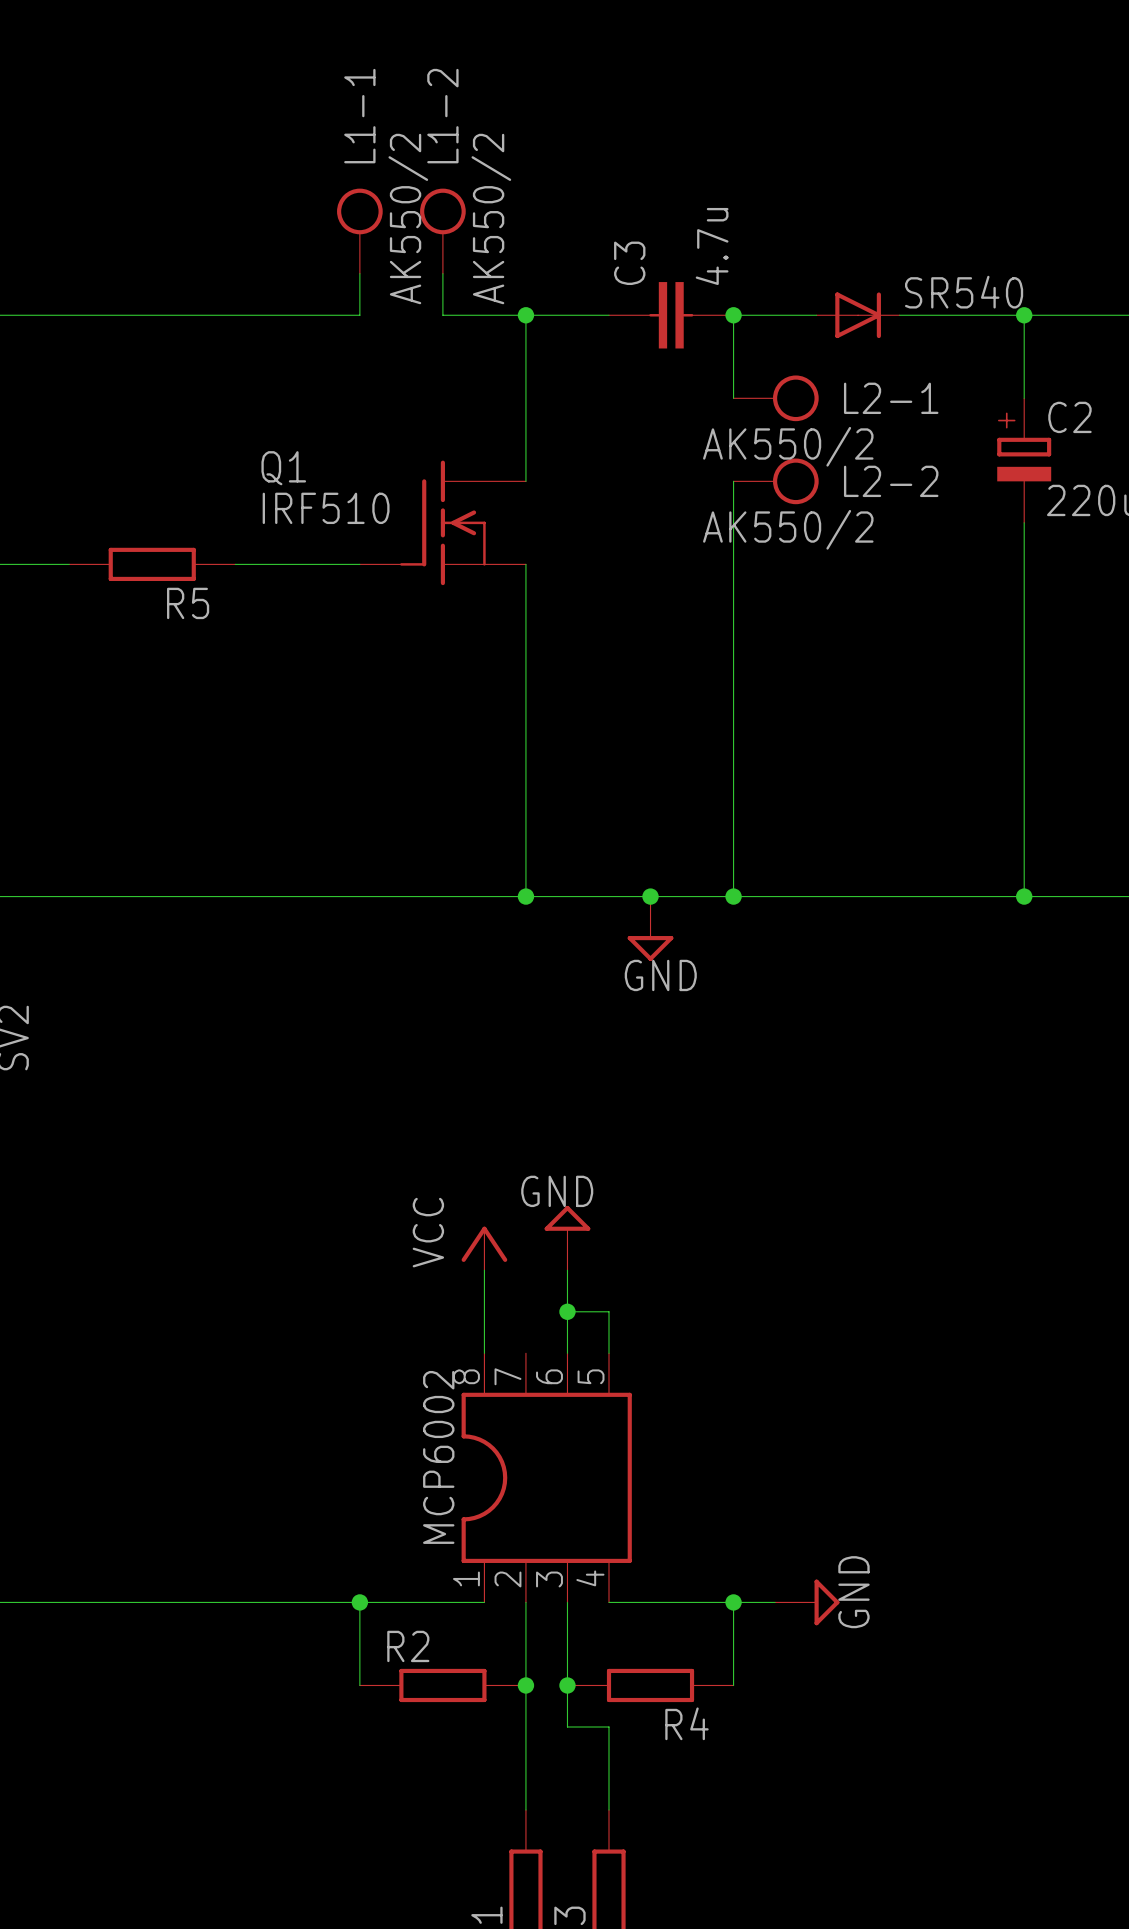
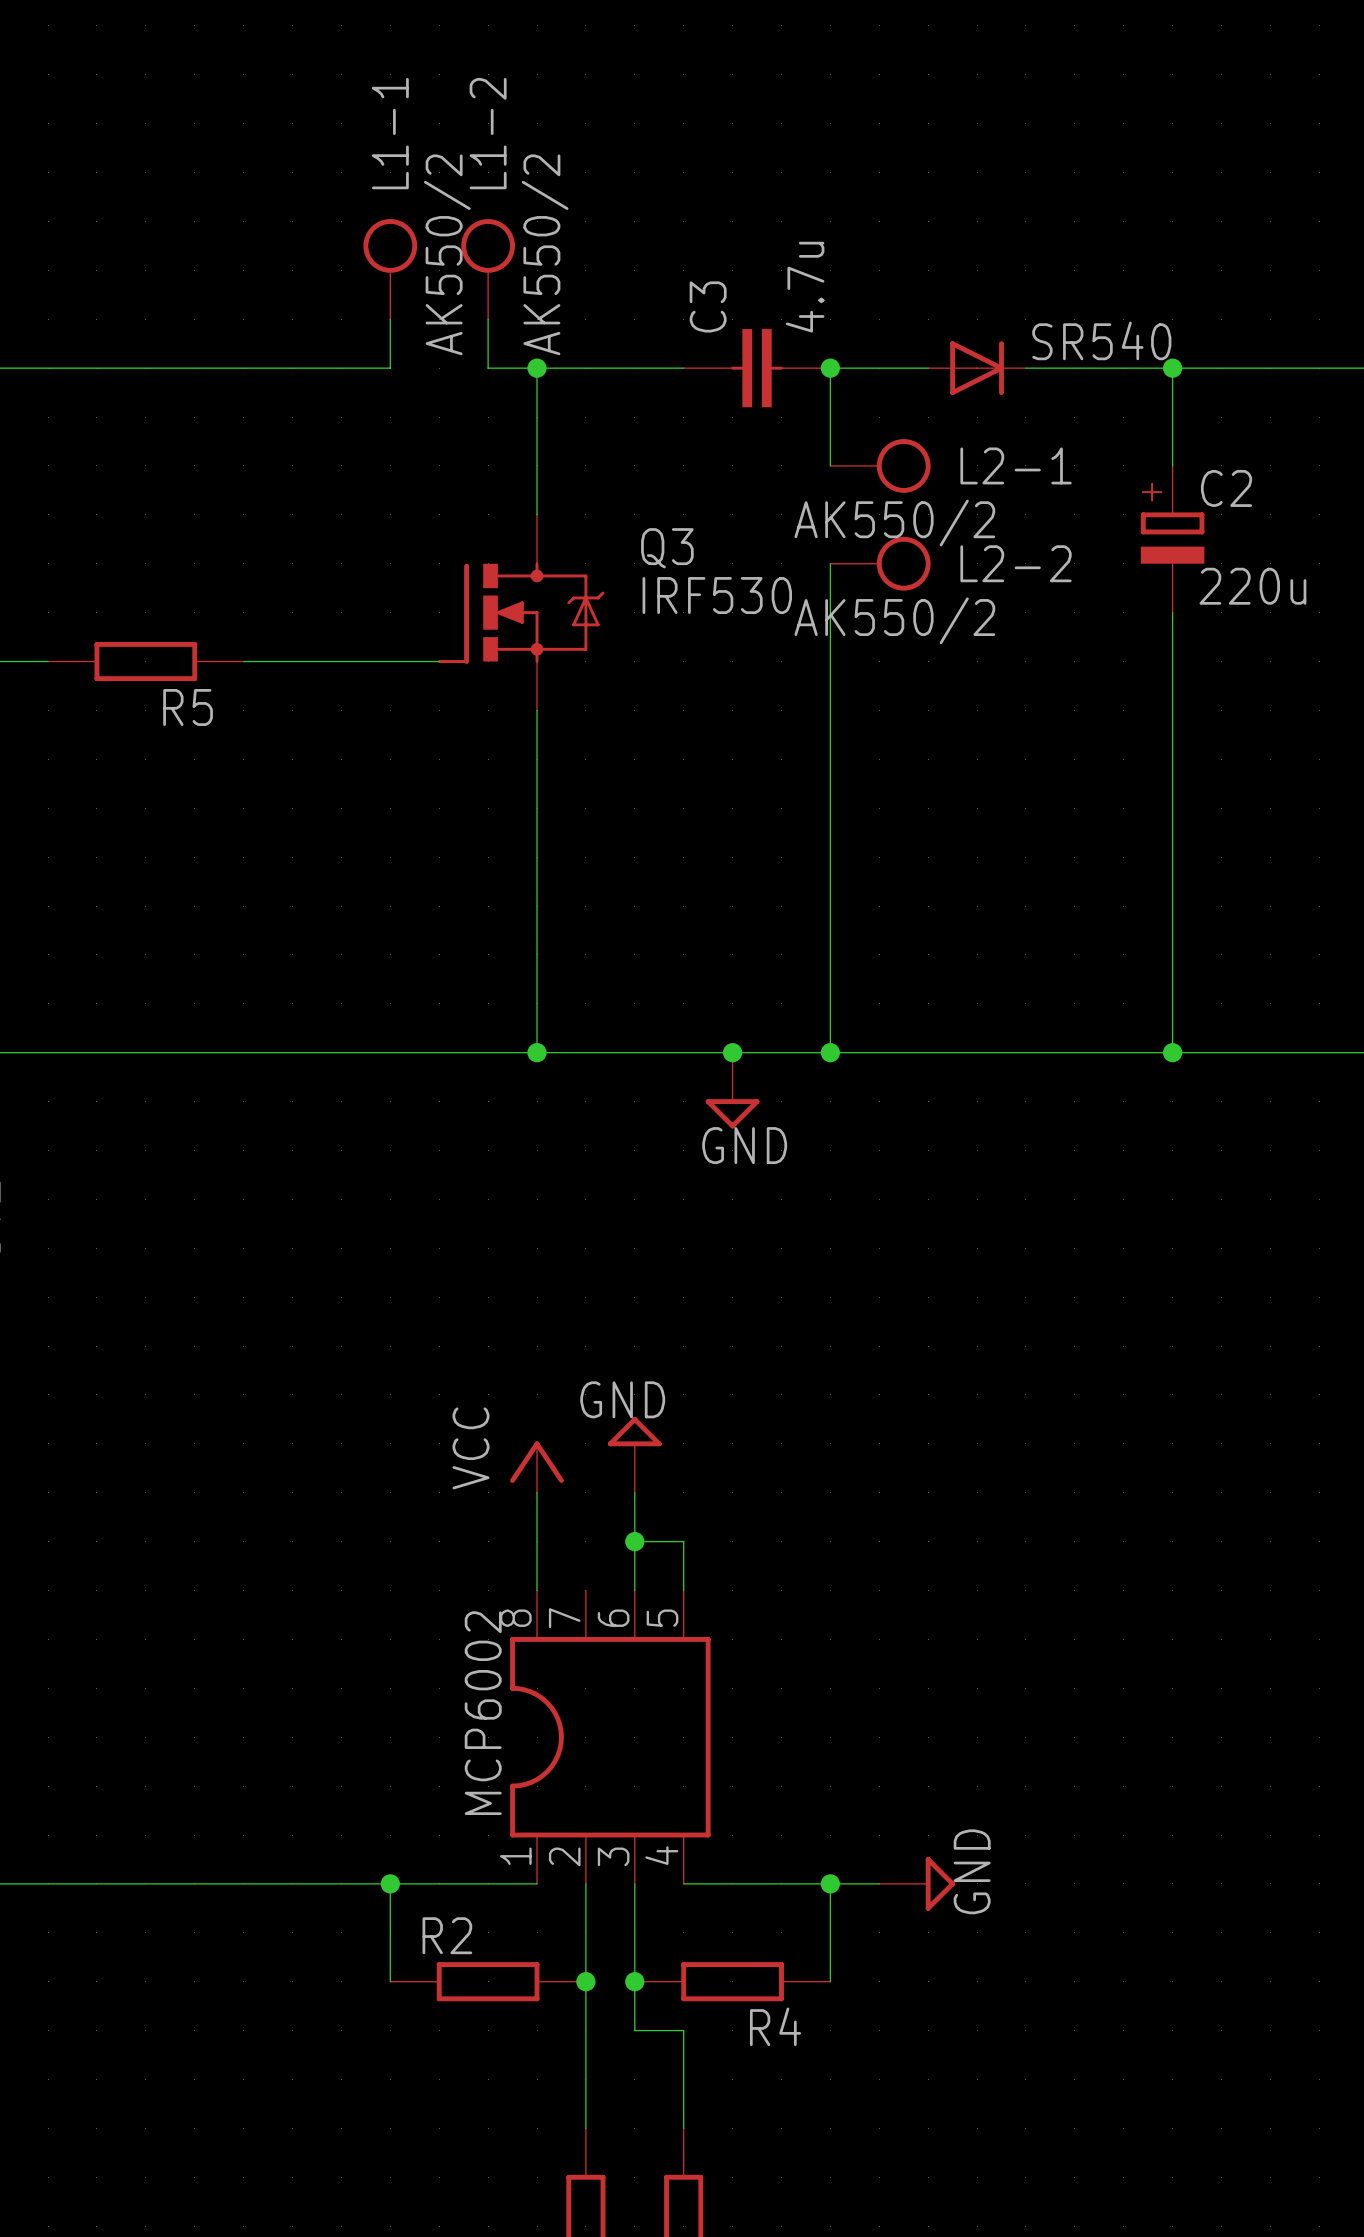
wire: none -> (537, 368) (537, 514)
wire: (525, 315) (525, 481) -> none
junction position: (525, 315) -> (537, 368)
Q1: IRF510 (442, 522) -> none
Q3: none -> IRF530 (521, 612)
wire: (525, 564) (525, 896) -> none
wire: none -> (537, 710) (537, 1052)
junction position: (525, 896) -> (537, 1052)

